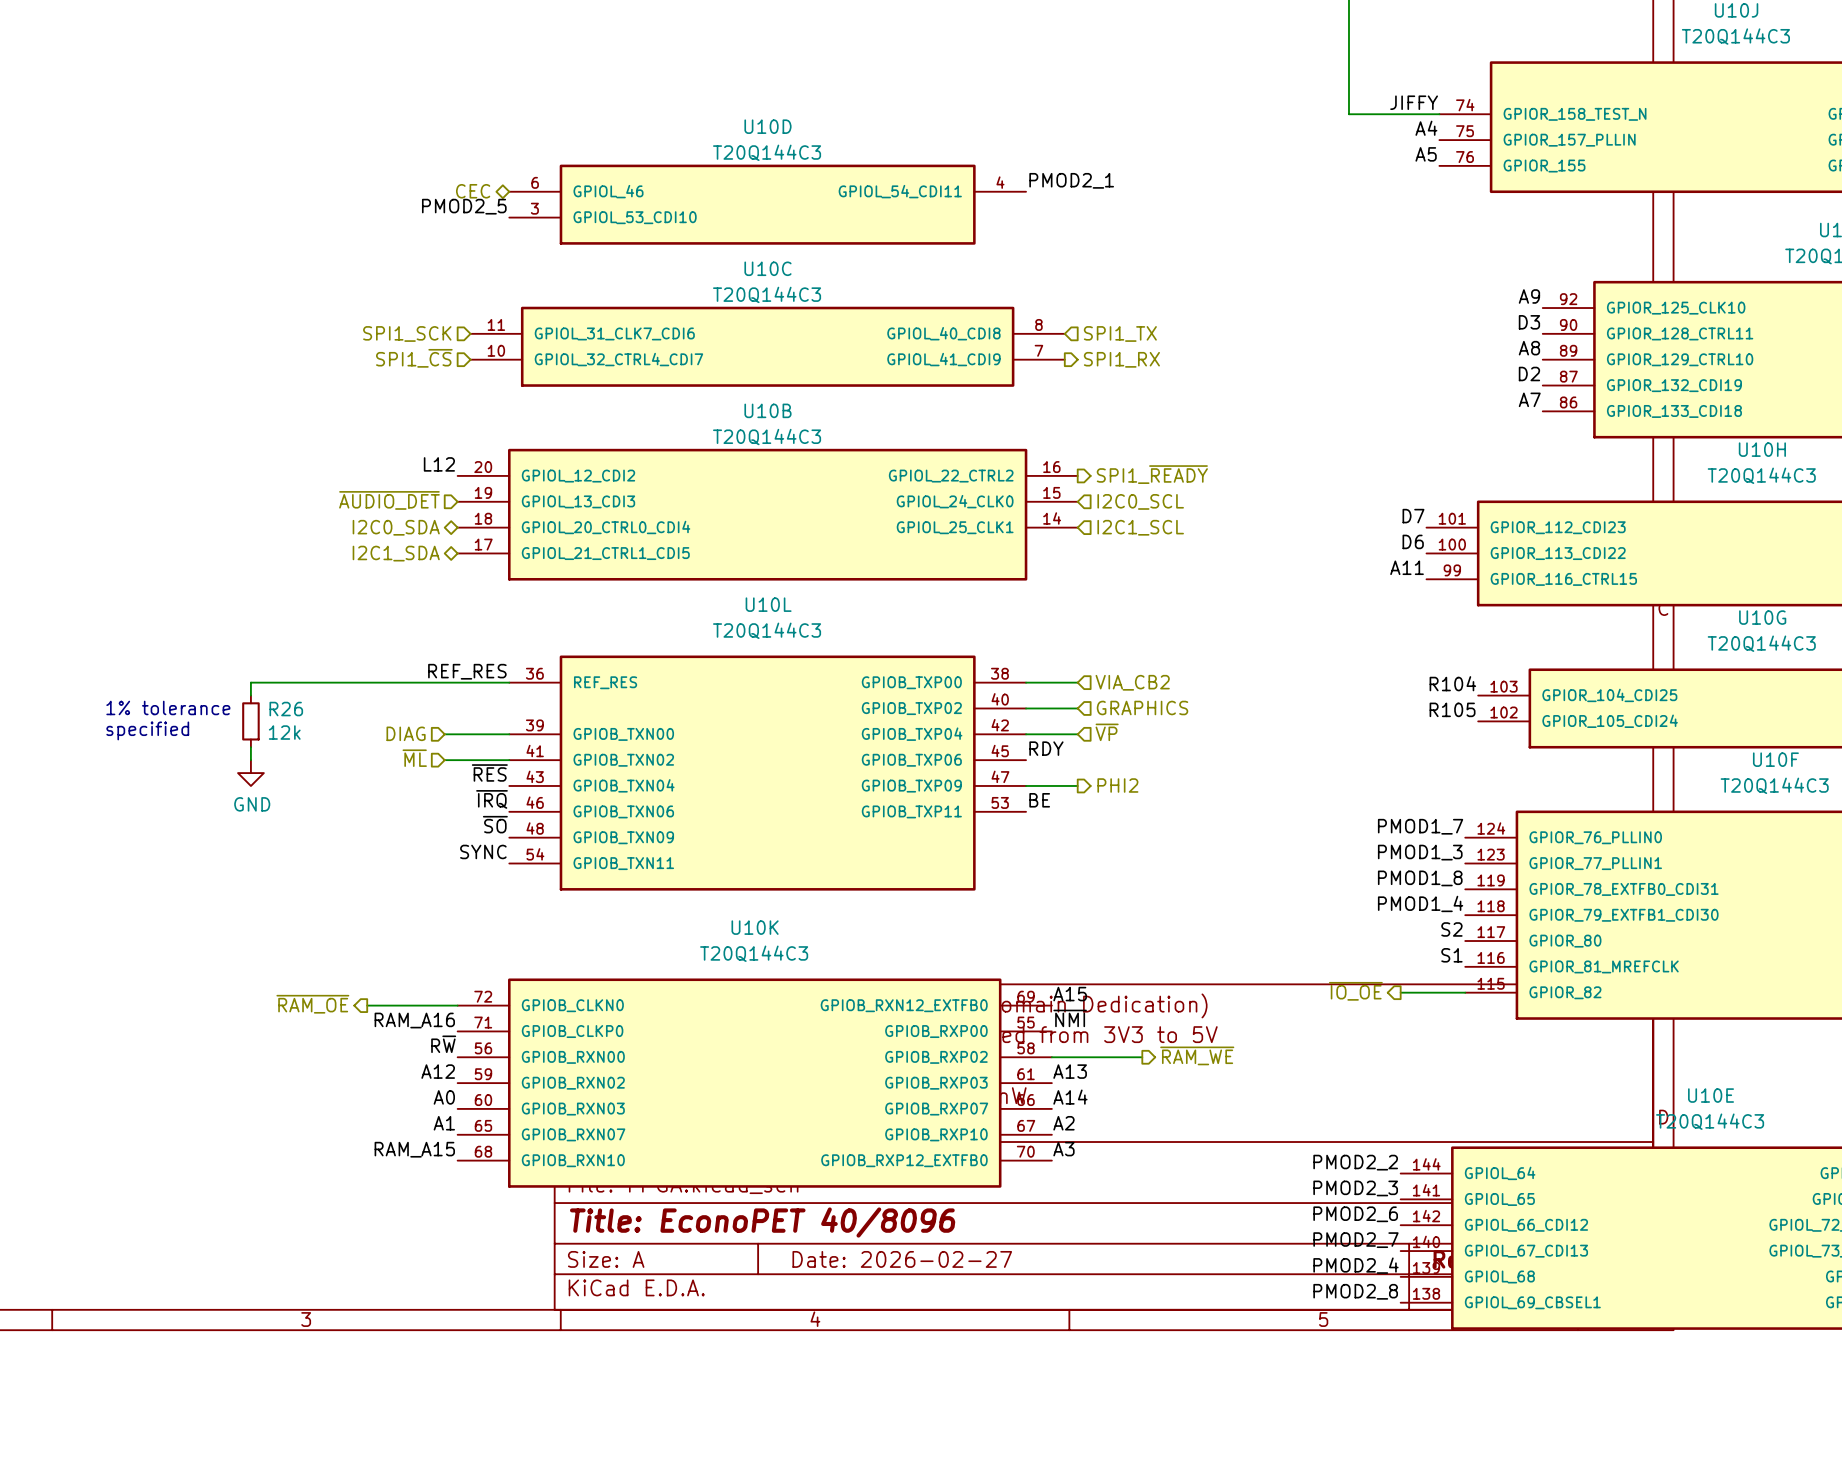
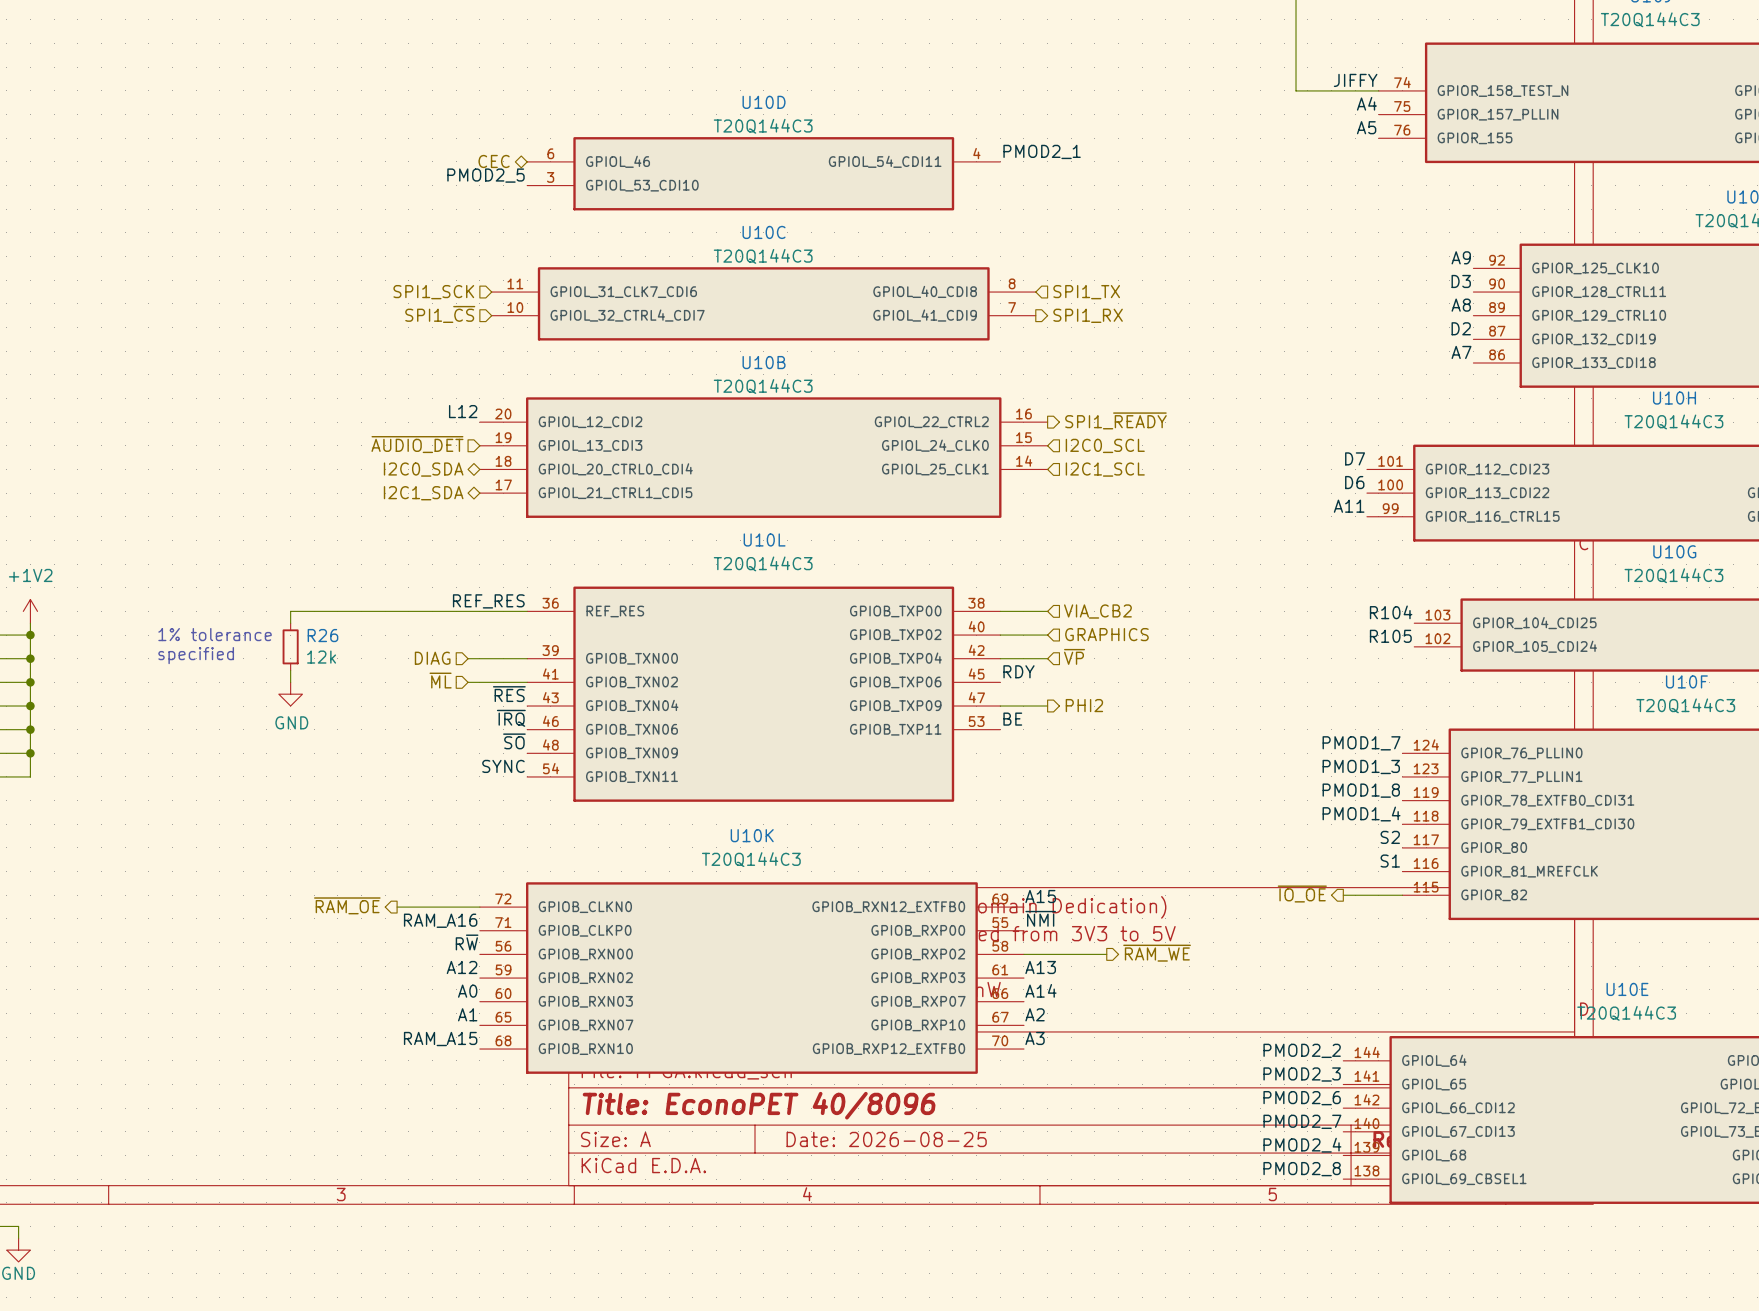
title block: Date: 2026-02-27 (902, 1259) -> Date: 2026-08-25 (886, 1139)

